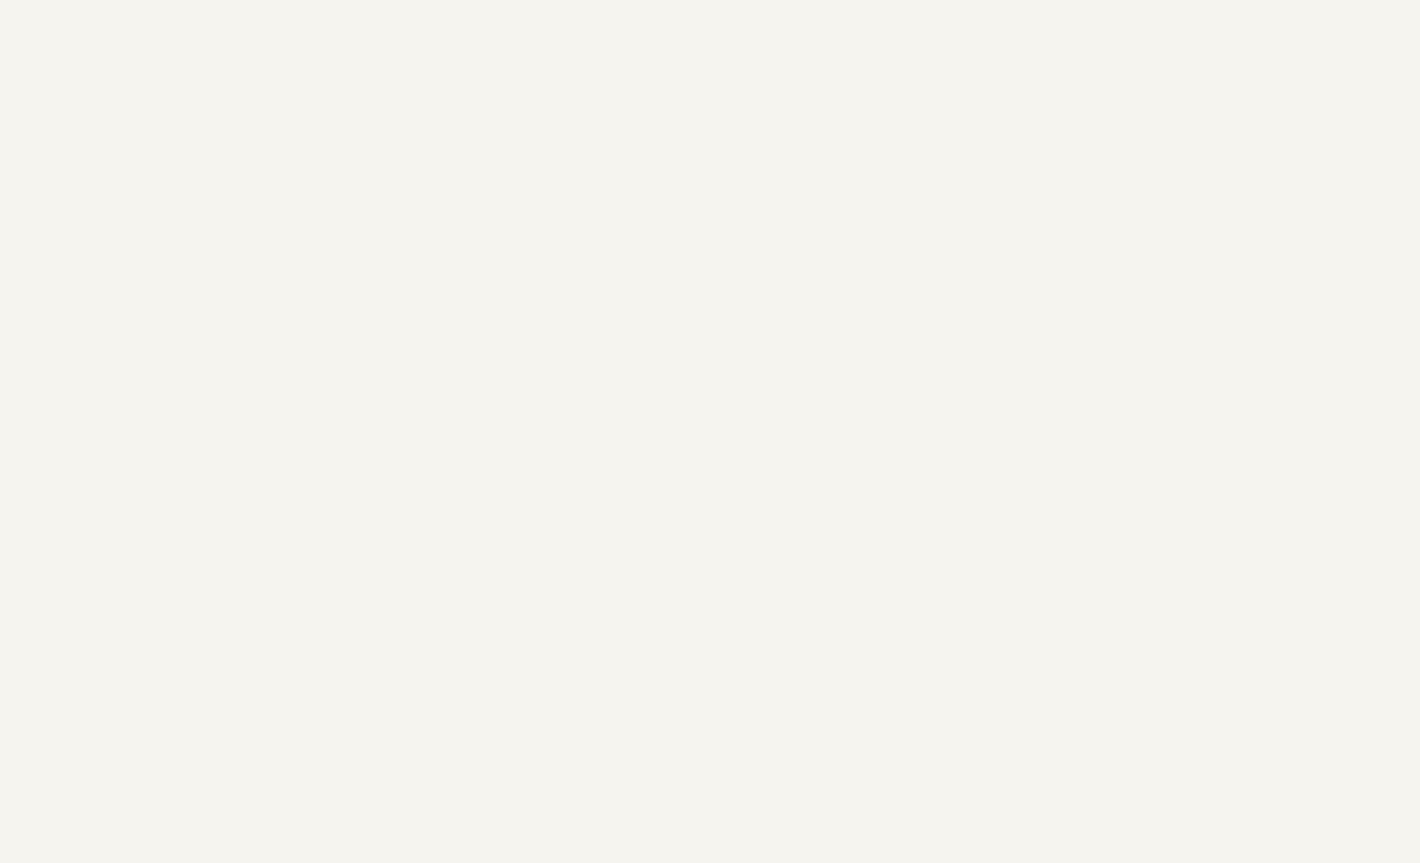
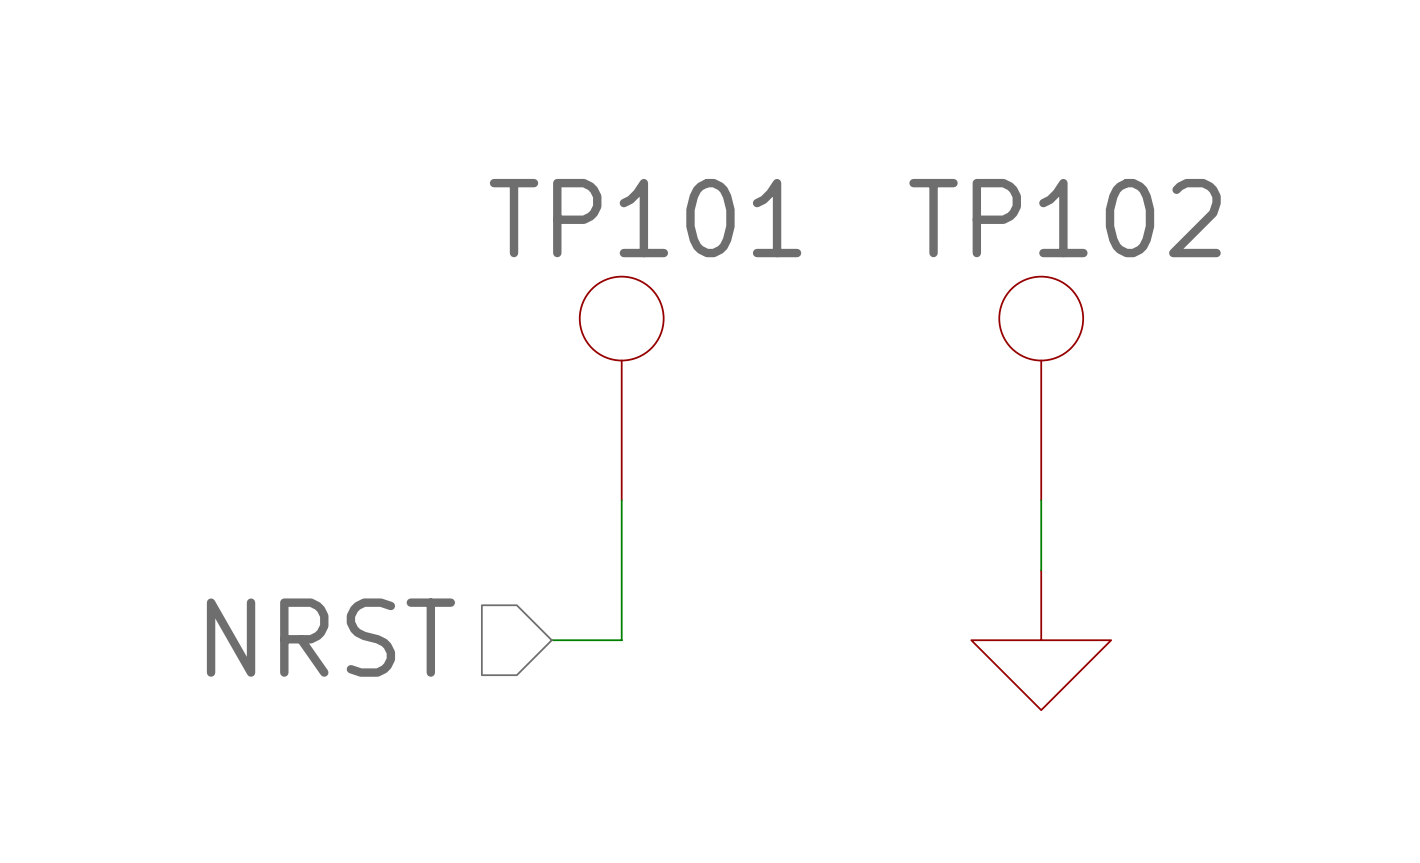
TP101: none -> (621, 388)
TP102: none -> (1041, 388)
wire: none -> (621, 500) (621, 640) (551, 640)
wire: none -> (1041, 500) (1041, 570)
hierarchical label: none -> NRST (330, 637)
power symbol: none -> (1041, 640)

